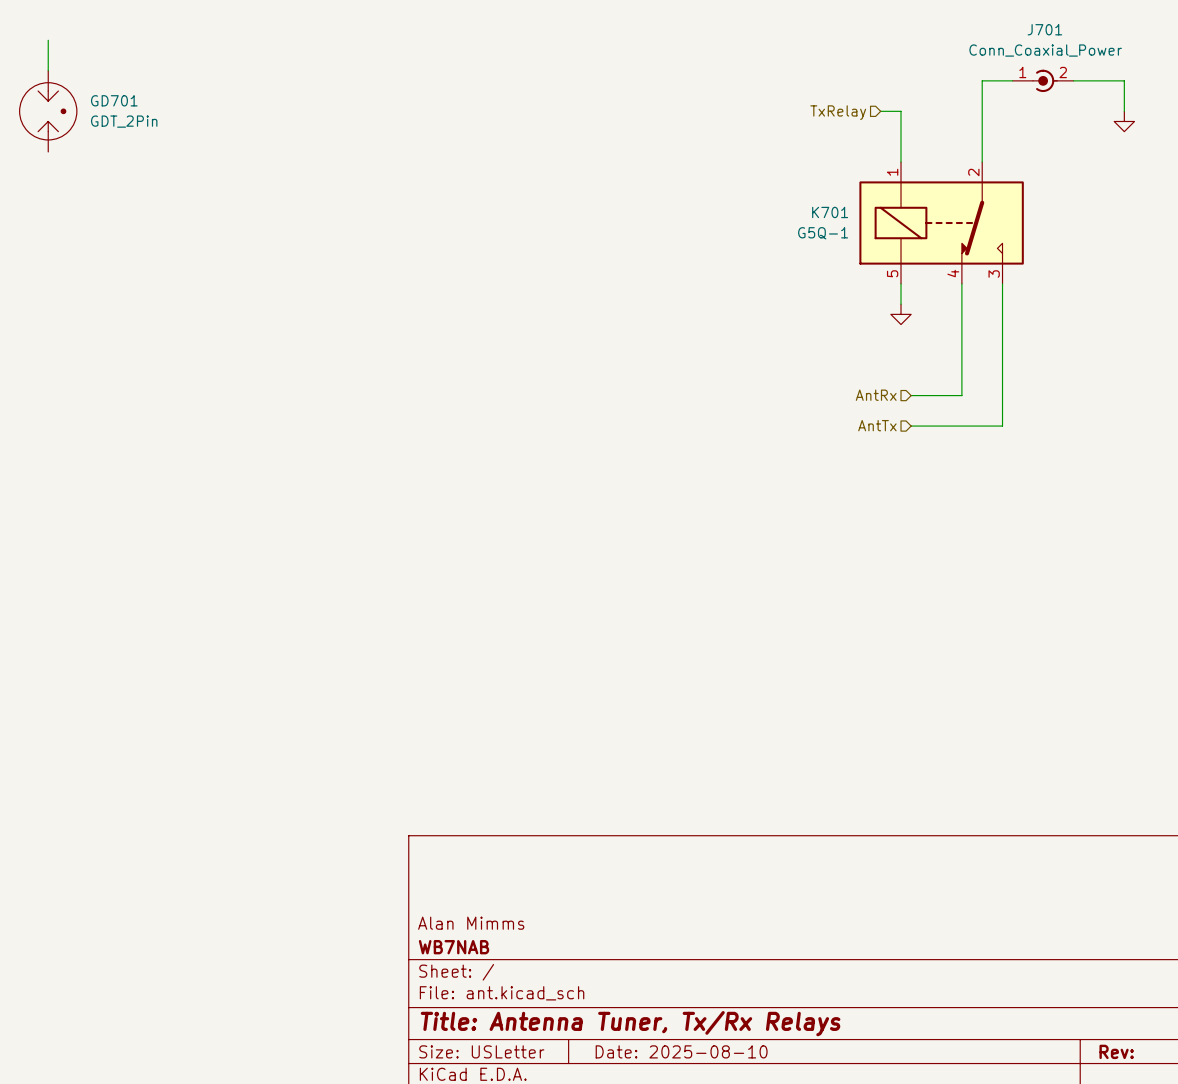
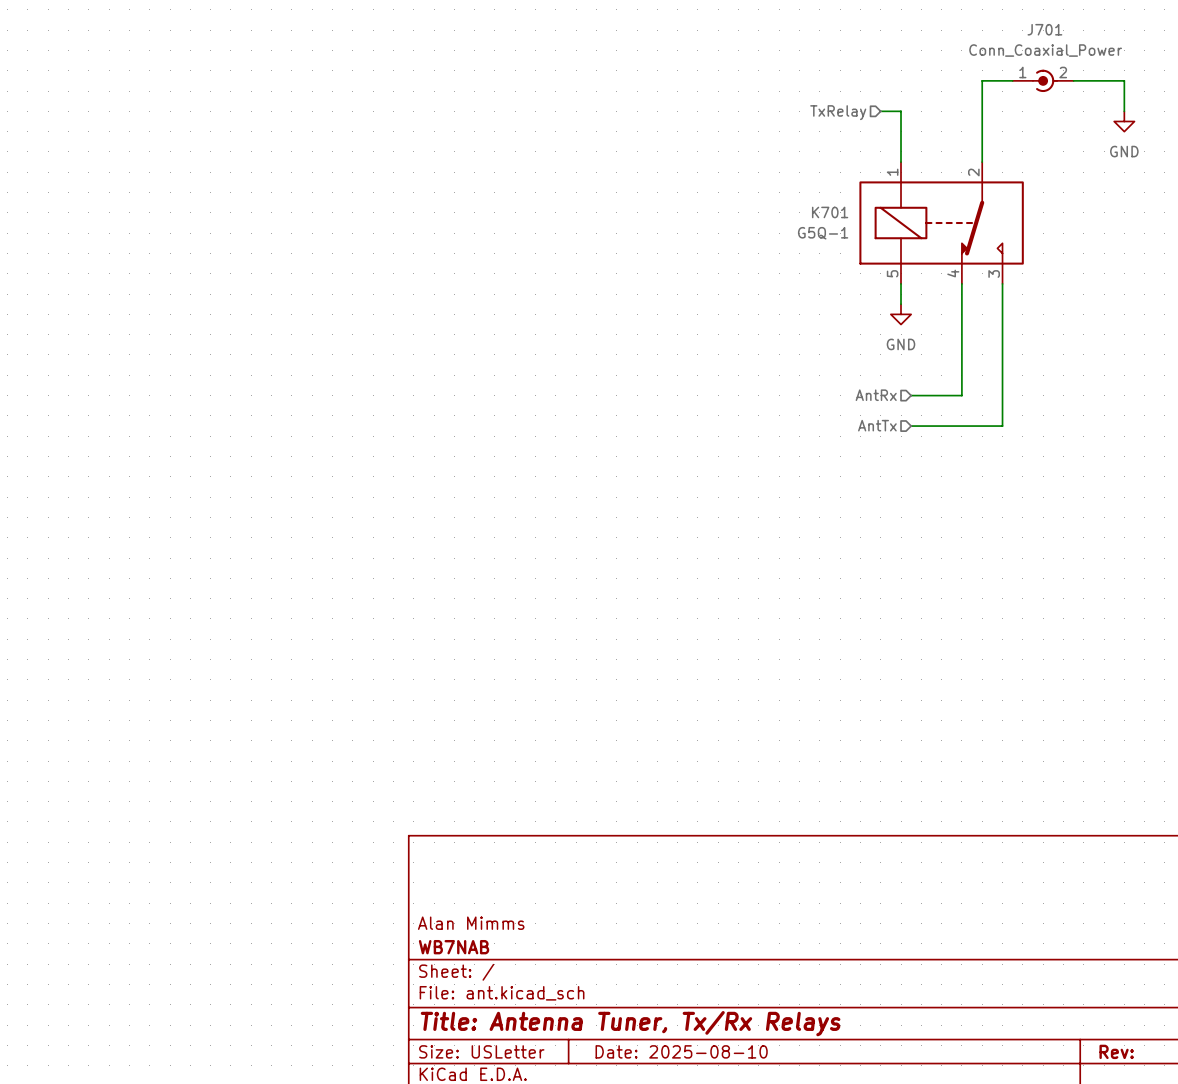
wire: (48, 40) (48, 70) -> none
GD701: GDT_2Pin (48, 111) -> none
power symbol text: none -> GND (1124, 151)
power symbol text: none -> GND (901, 344)

